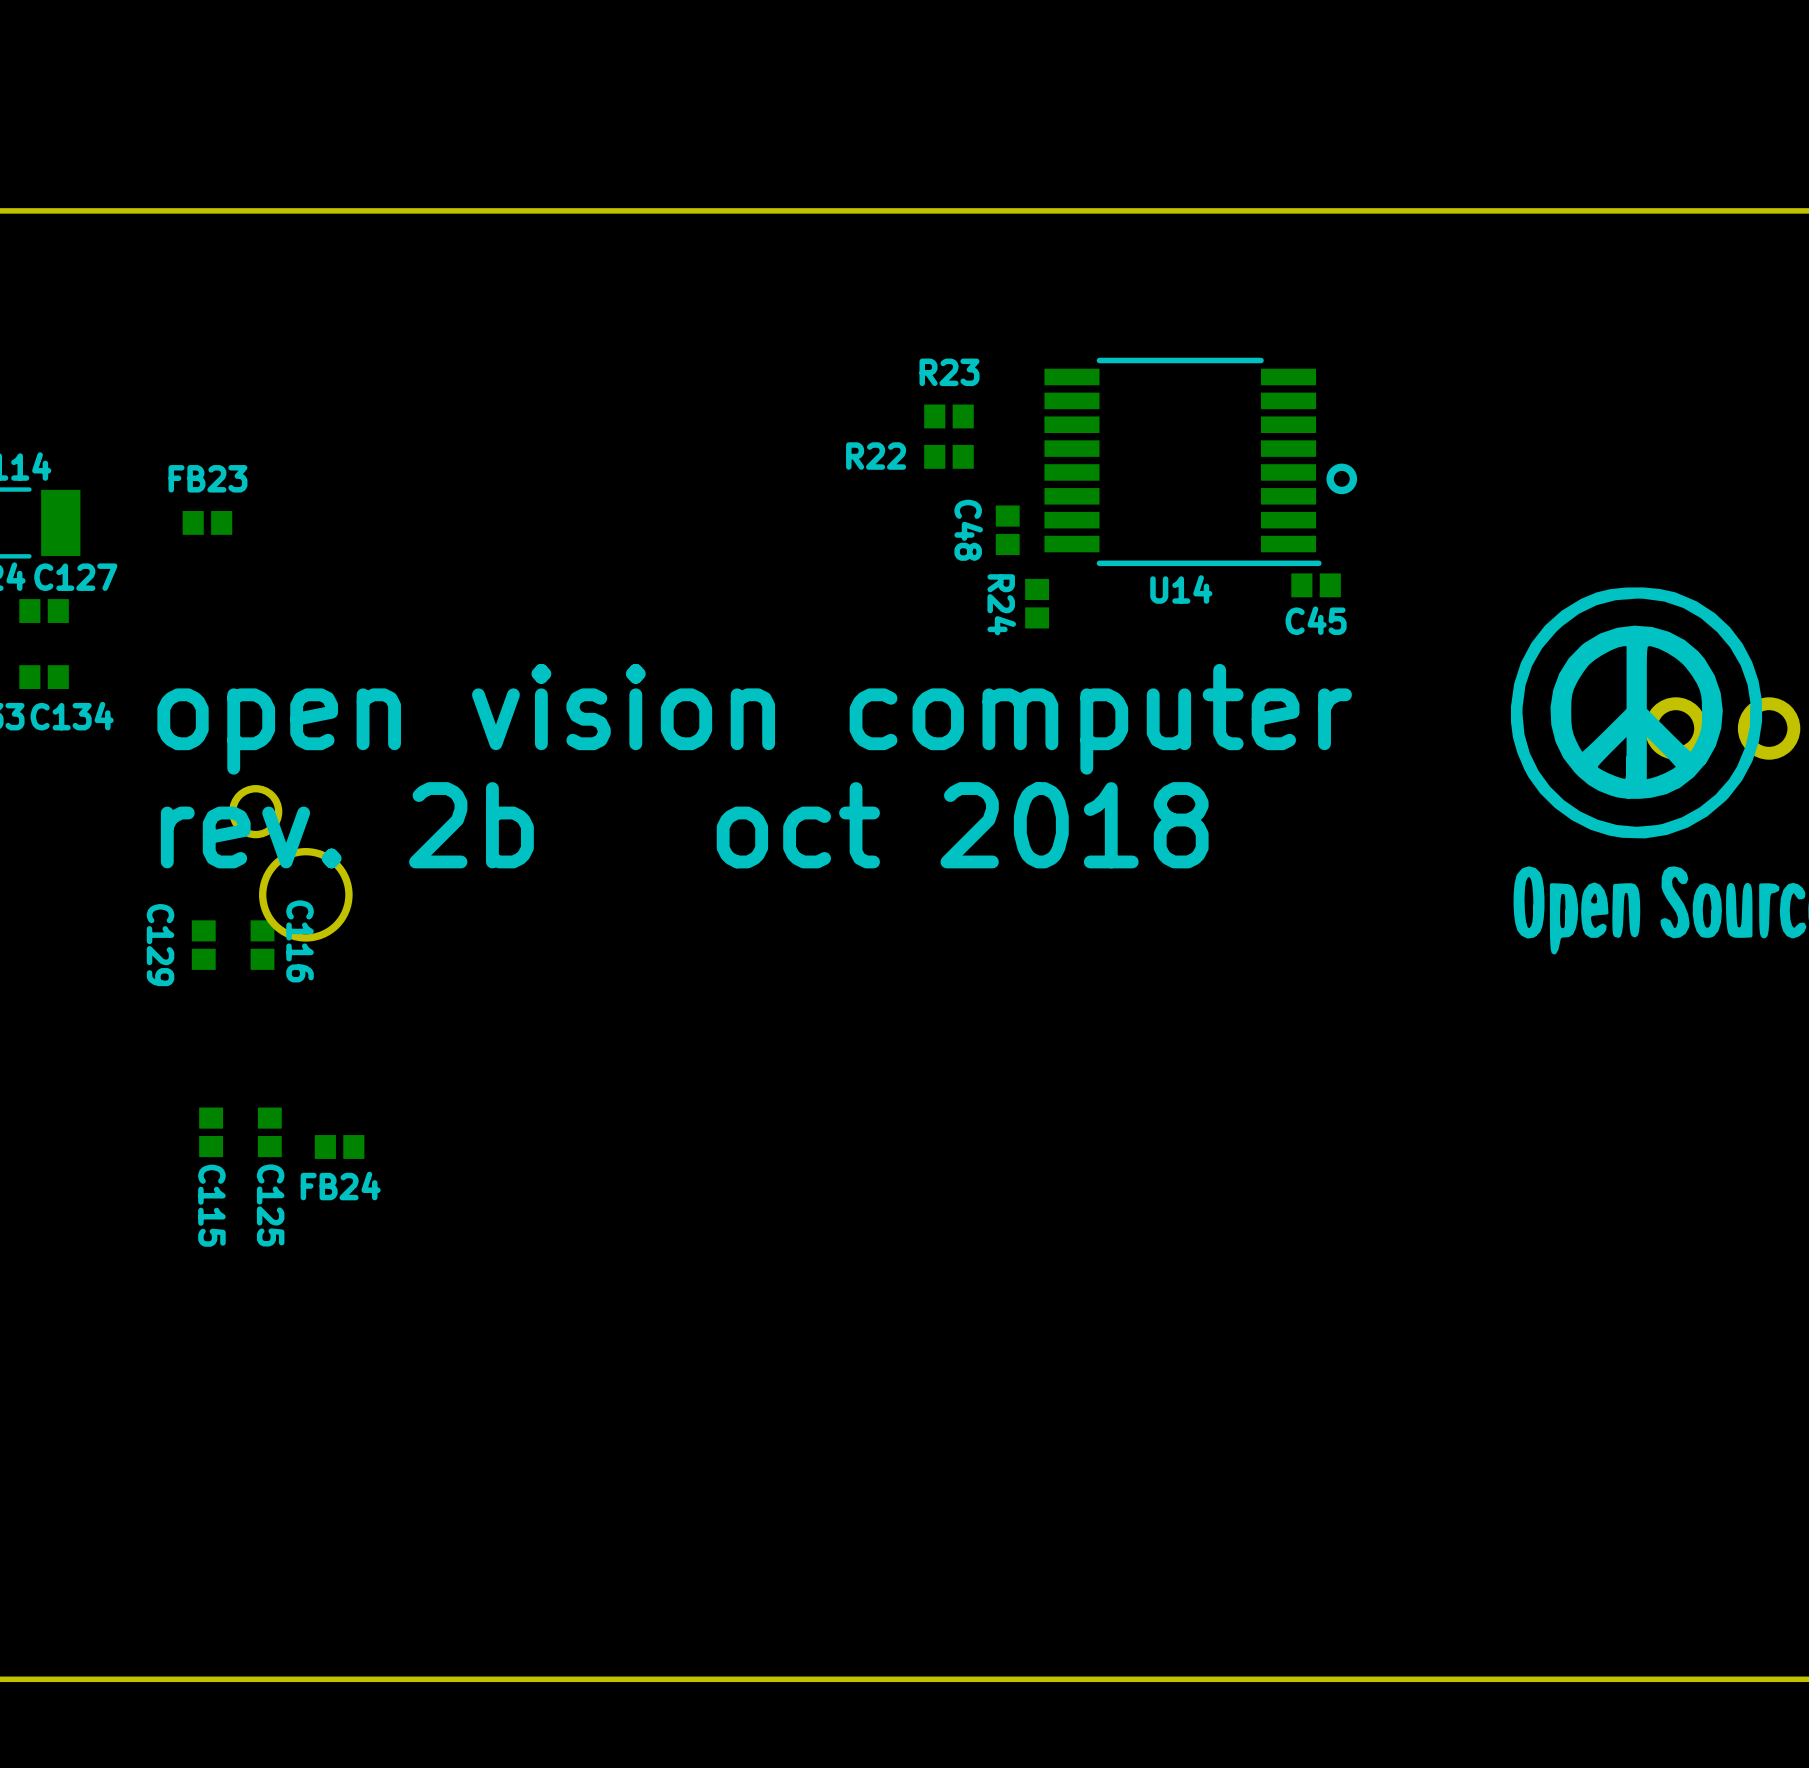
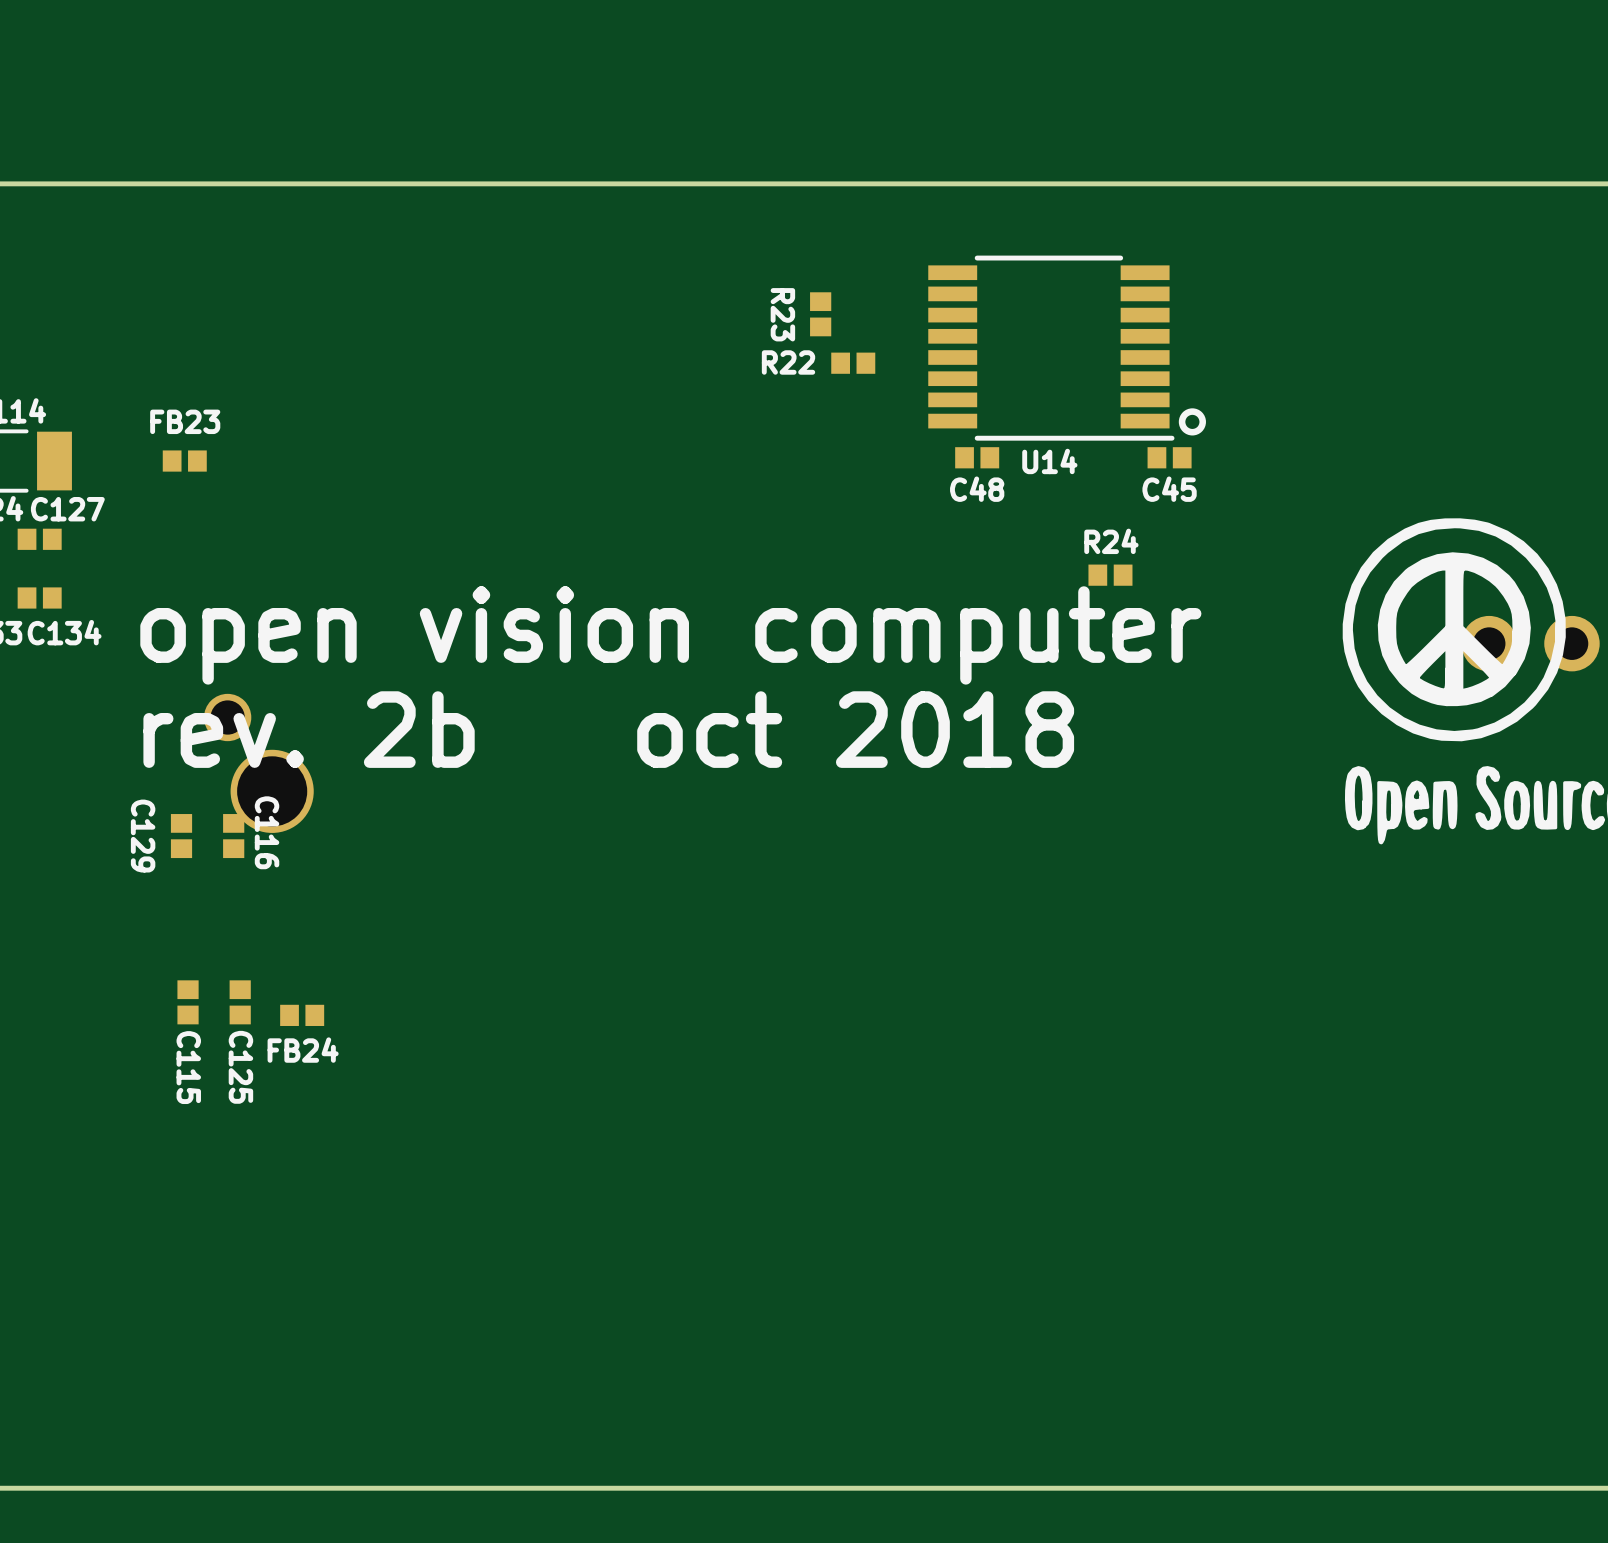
R23 rotation: 0° (948, 416) -> 90° clockwise (820, 314)
R23 position: (948, 416) -> (820, 314)
R22 position: (948, 456) -> (853, 363)
U14 position: (1183, 461) -> (1051, 348)
C48 rotation: 0° (1007, 530) -> 90° clockwise (977, 457)
C48 position: (1007, 530) -> (977, 457)
C45 position: (1316, 585) -> (1169, 457)
R24 rotation: 0° (1037, 603) -> 90° clockwise (1110, 575)
R24 position: (1037, 603) -> (1110, 575)

